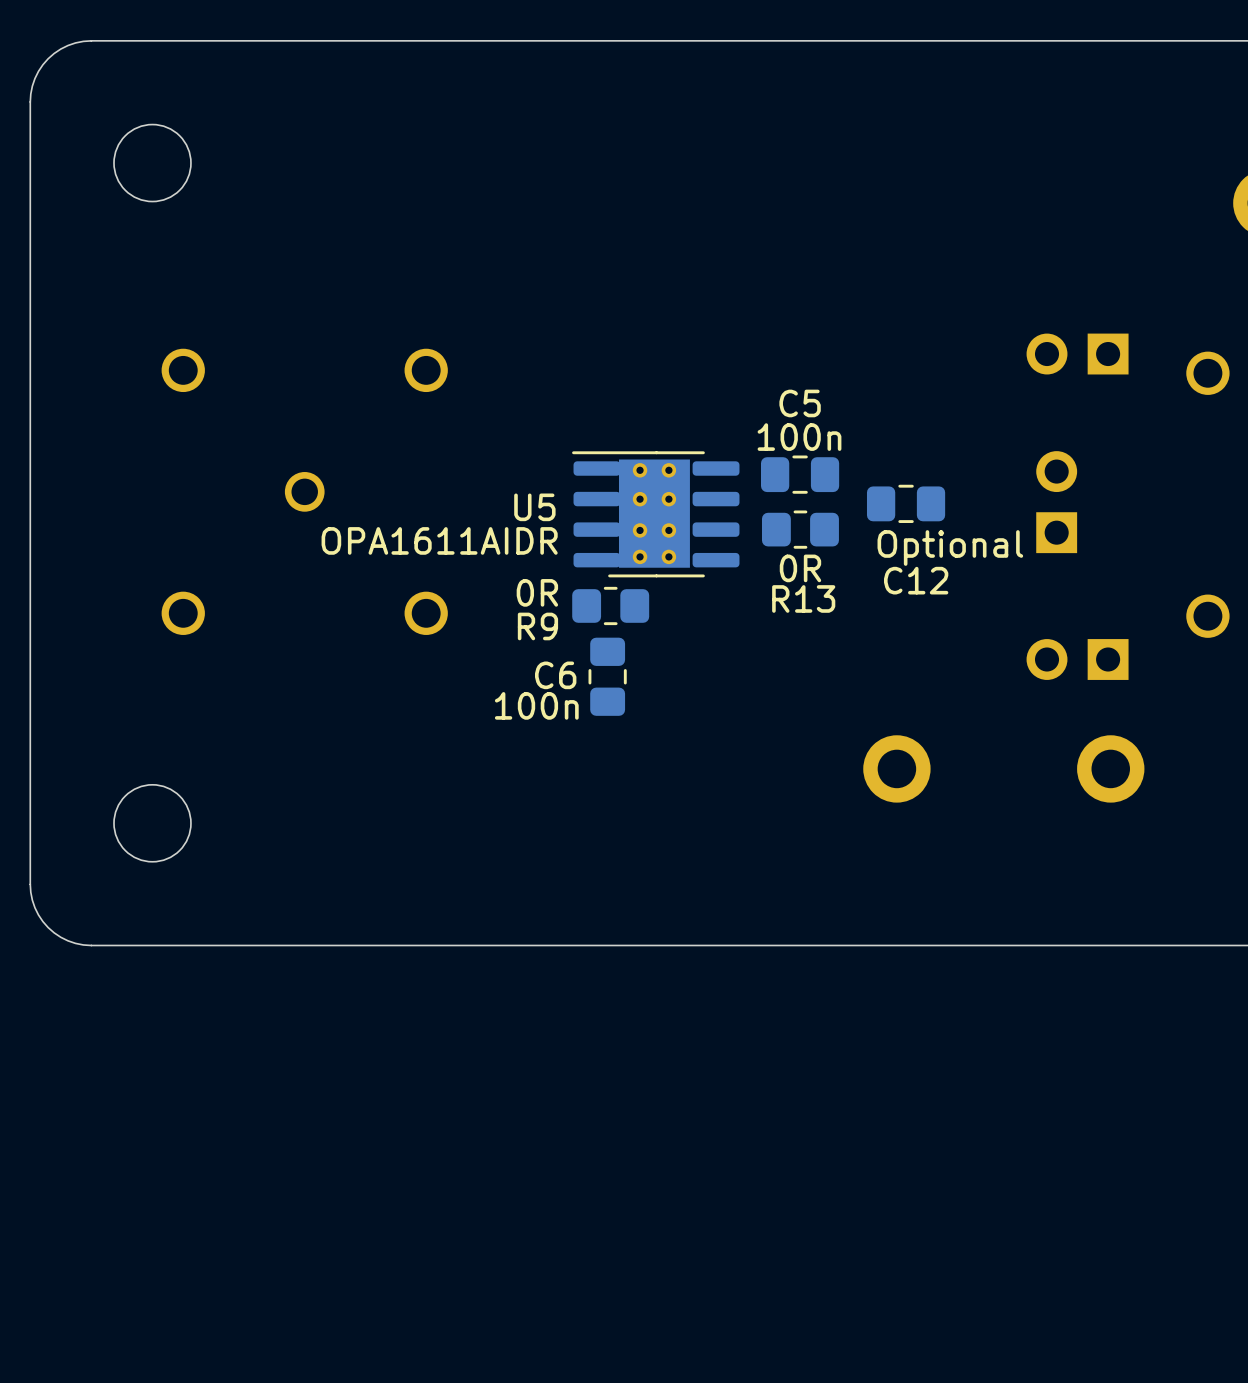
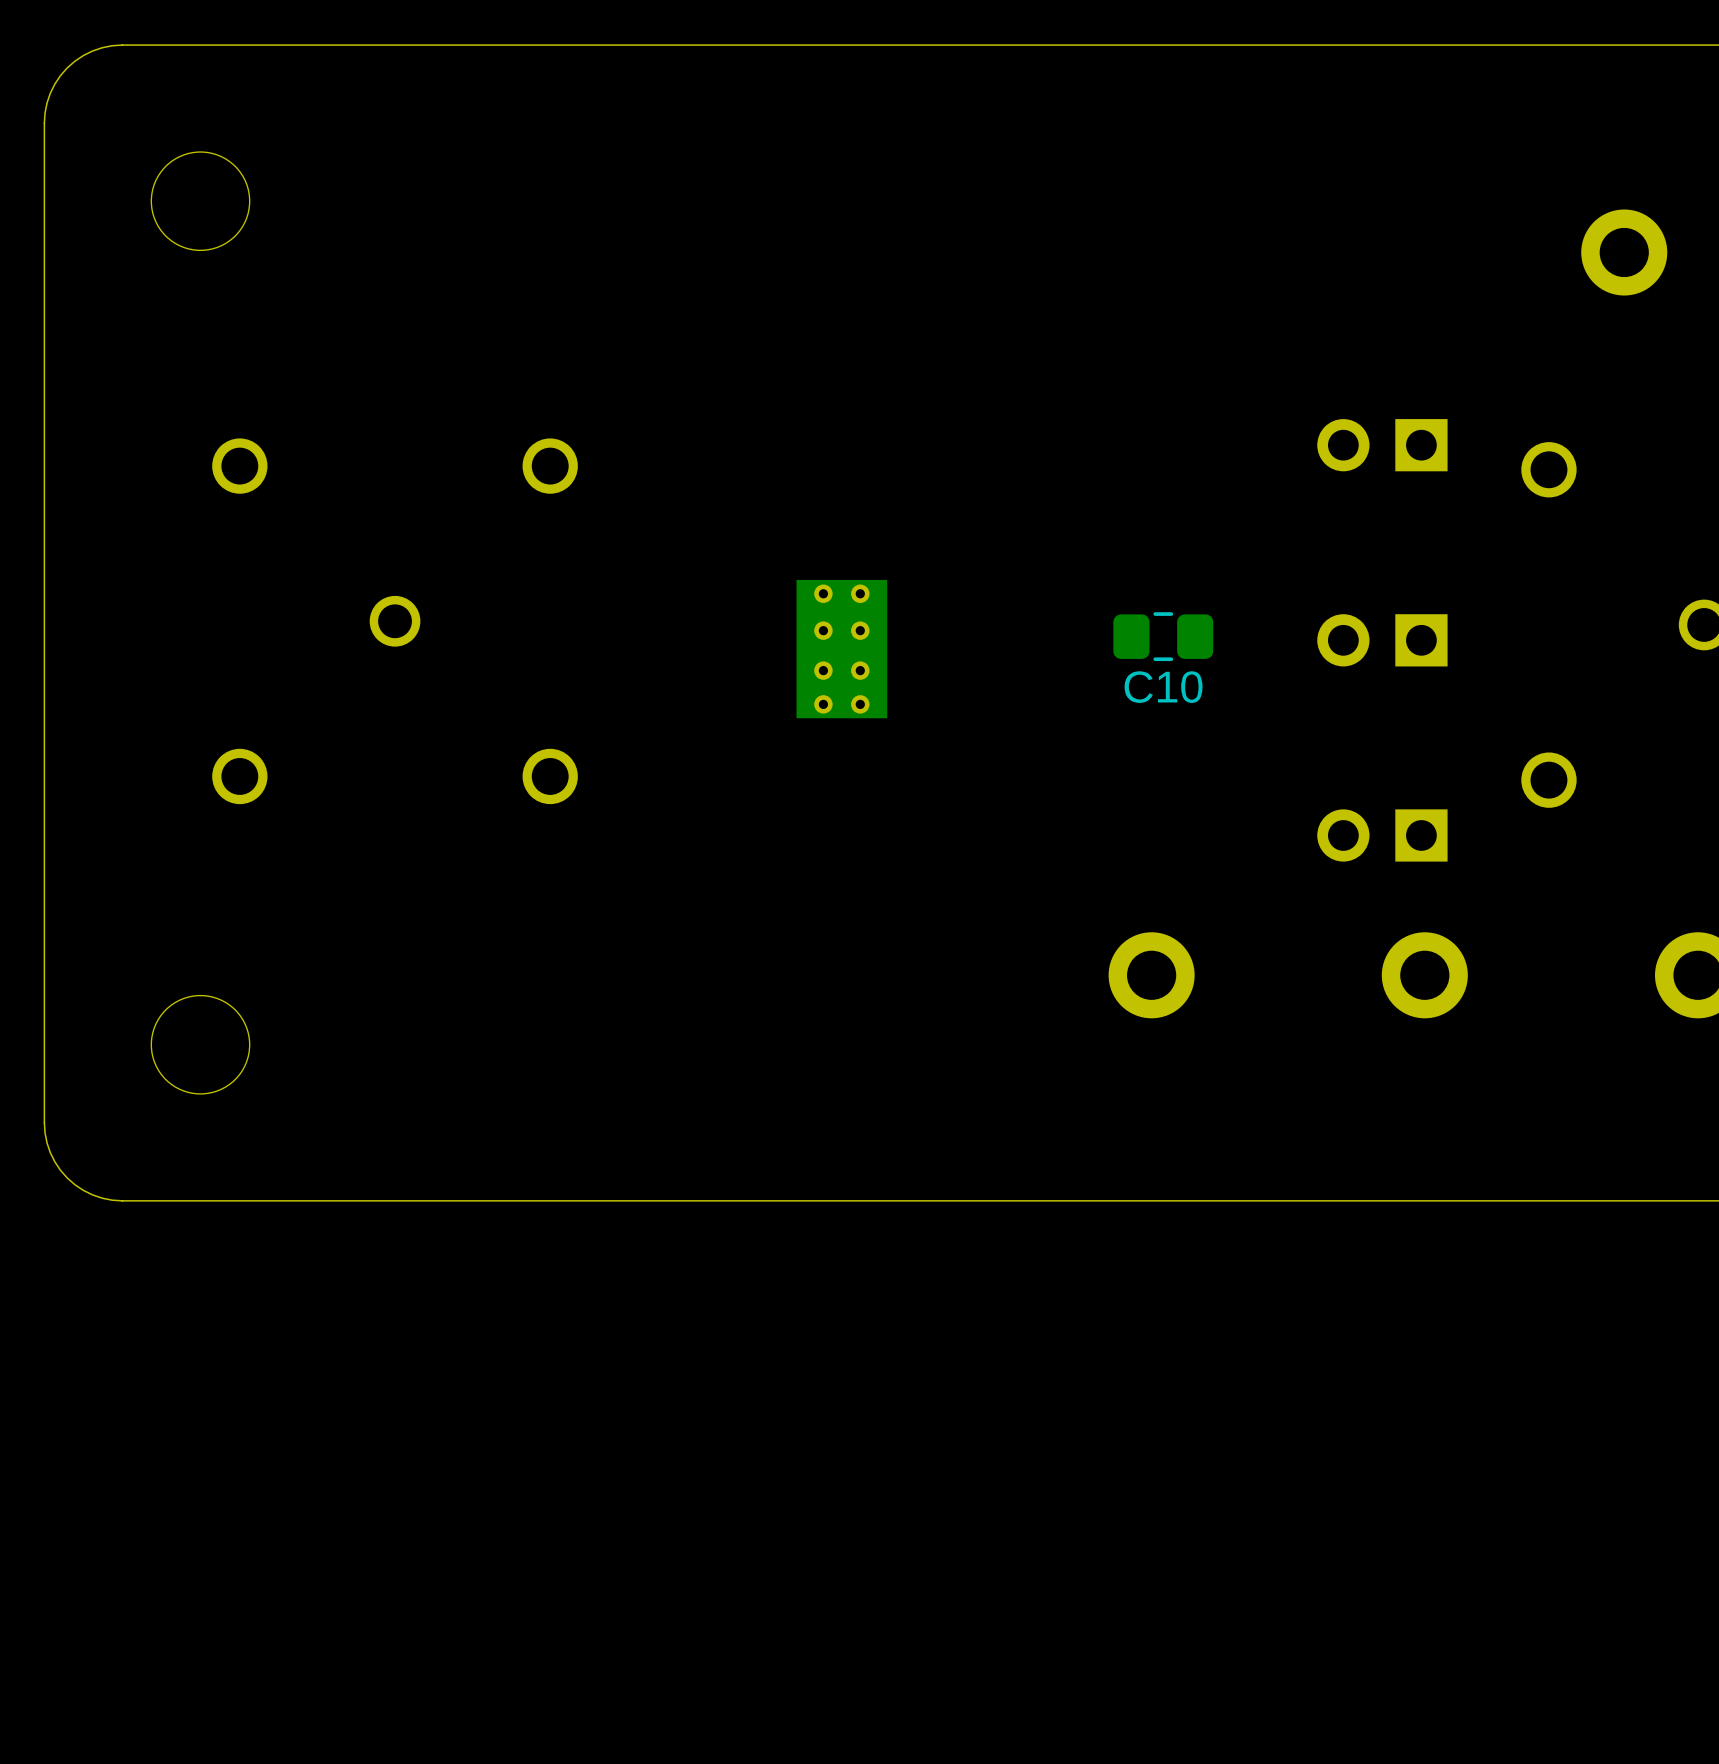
C5: 100n (800, 474) -> none
part rotation: 0° (1056, 502) -> 90° counterclockwise (1382, 640)
U5: OPA1611AIDR (655, 514) -> none
R13: 0R (800, 529) -> none
C12 value: Optional (950, 548) -> none
C12 name: C12 (916, 580) -> C10 (1163, 687)
R9: 0R (610, 605) -> none
C6: 100n (607, 676) -> none

